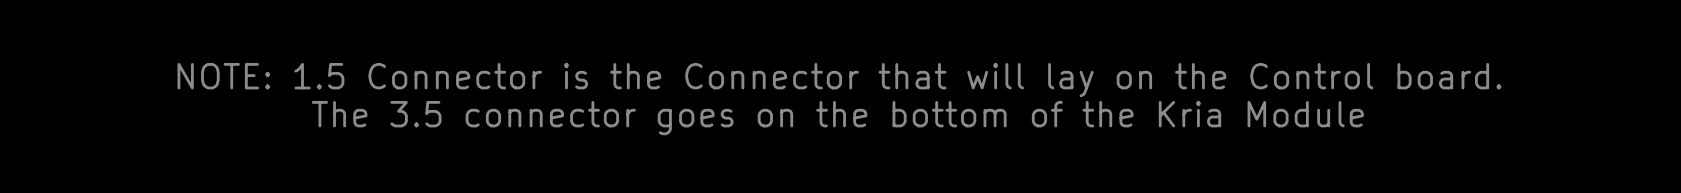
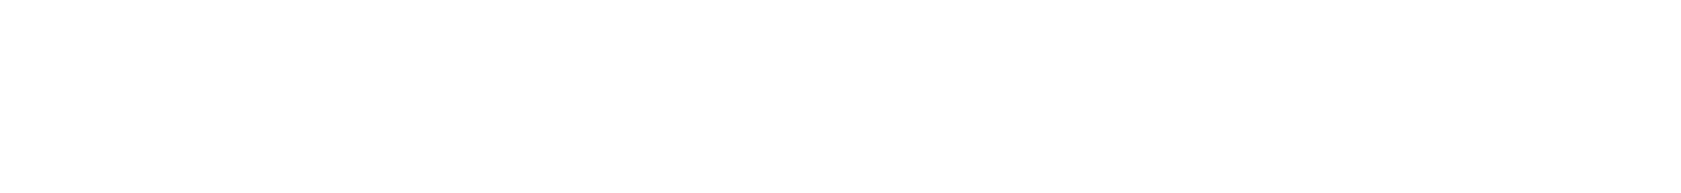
text: NOTE: 1.5 Connector is the Connector that will lay on the Control board. (839, 80) -> none
text: The 3.5 connector goes on the bottom of the Kria Module (837, 118) -> none

